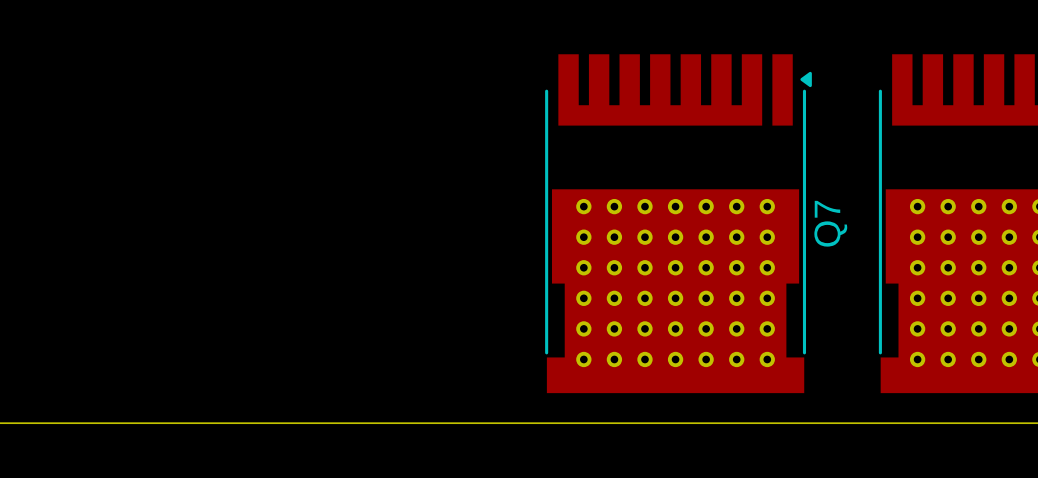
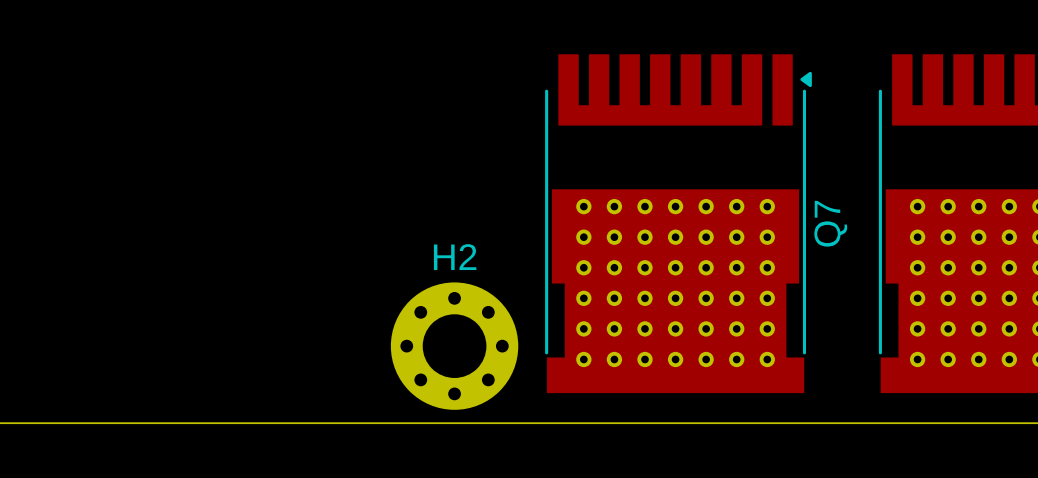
H2: none -> (454, 346)

